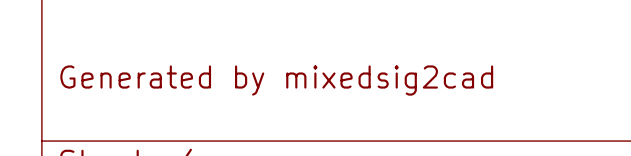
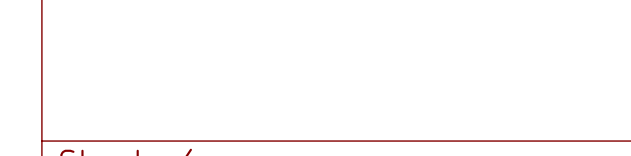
title block: Generated by mixedsig2cad (276, 80) -> none

